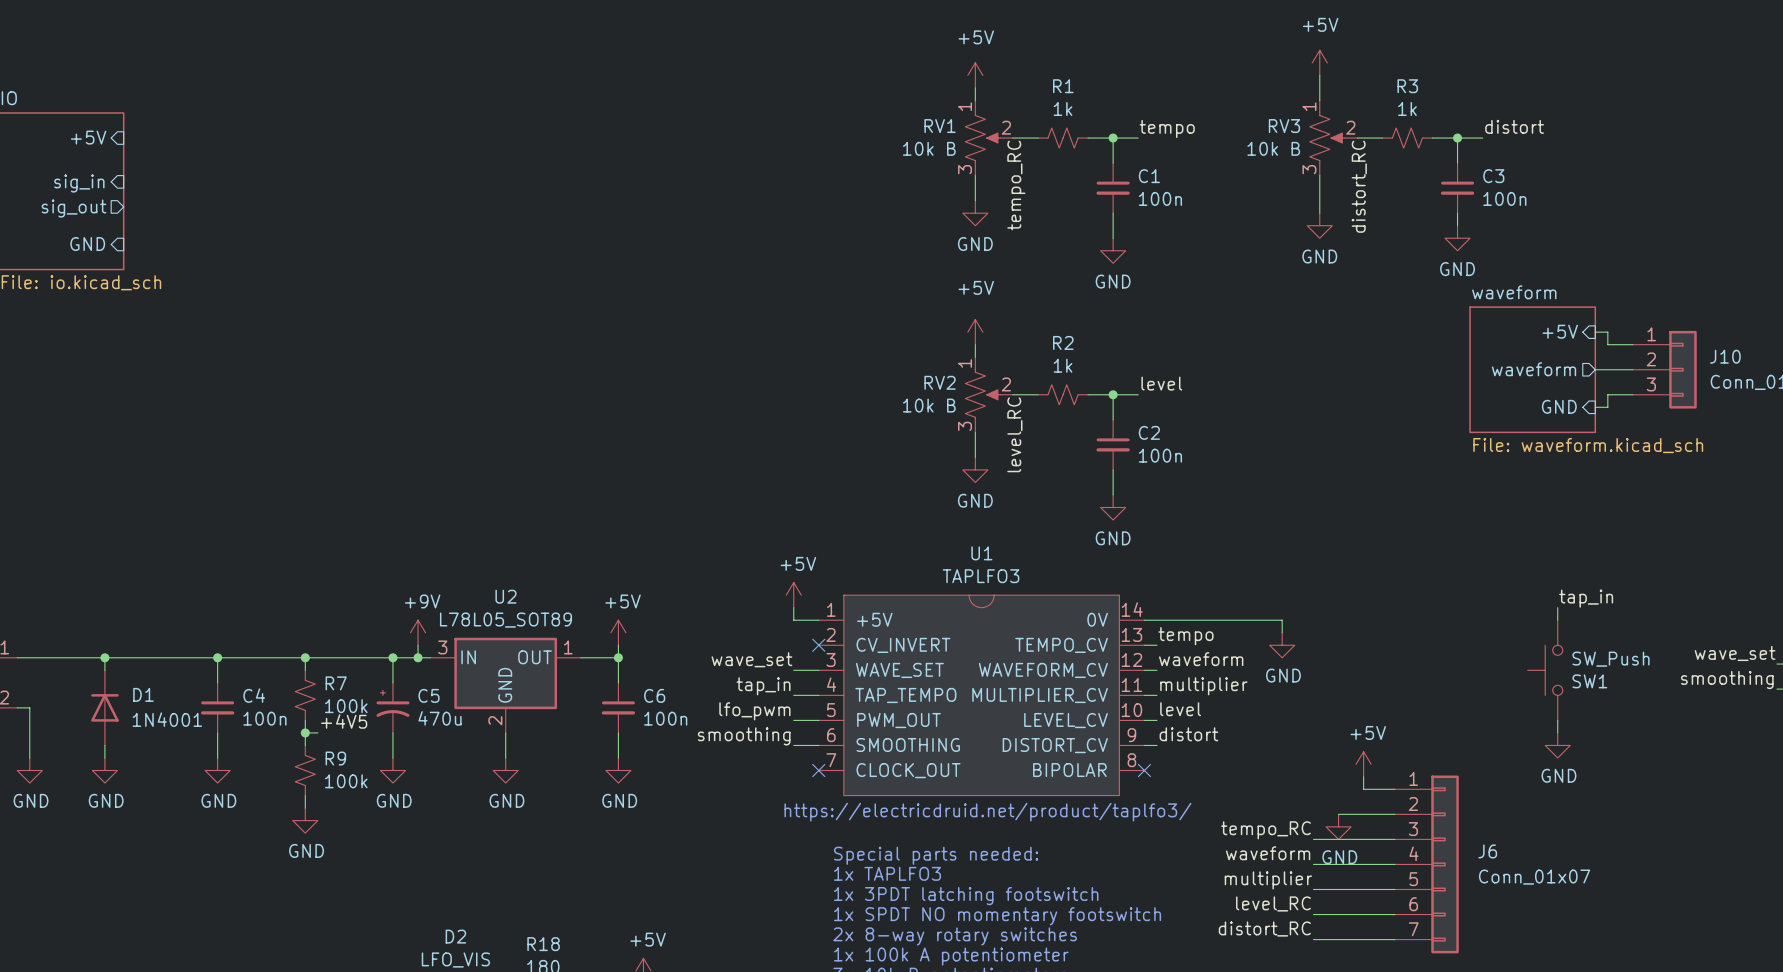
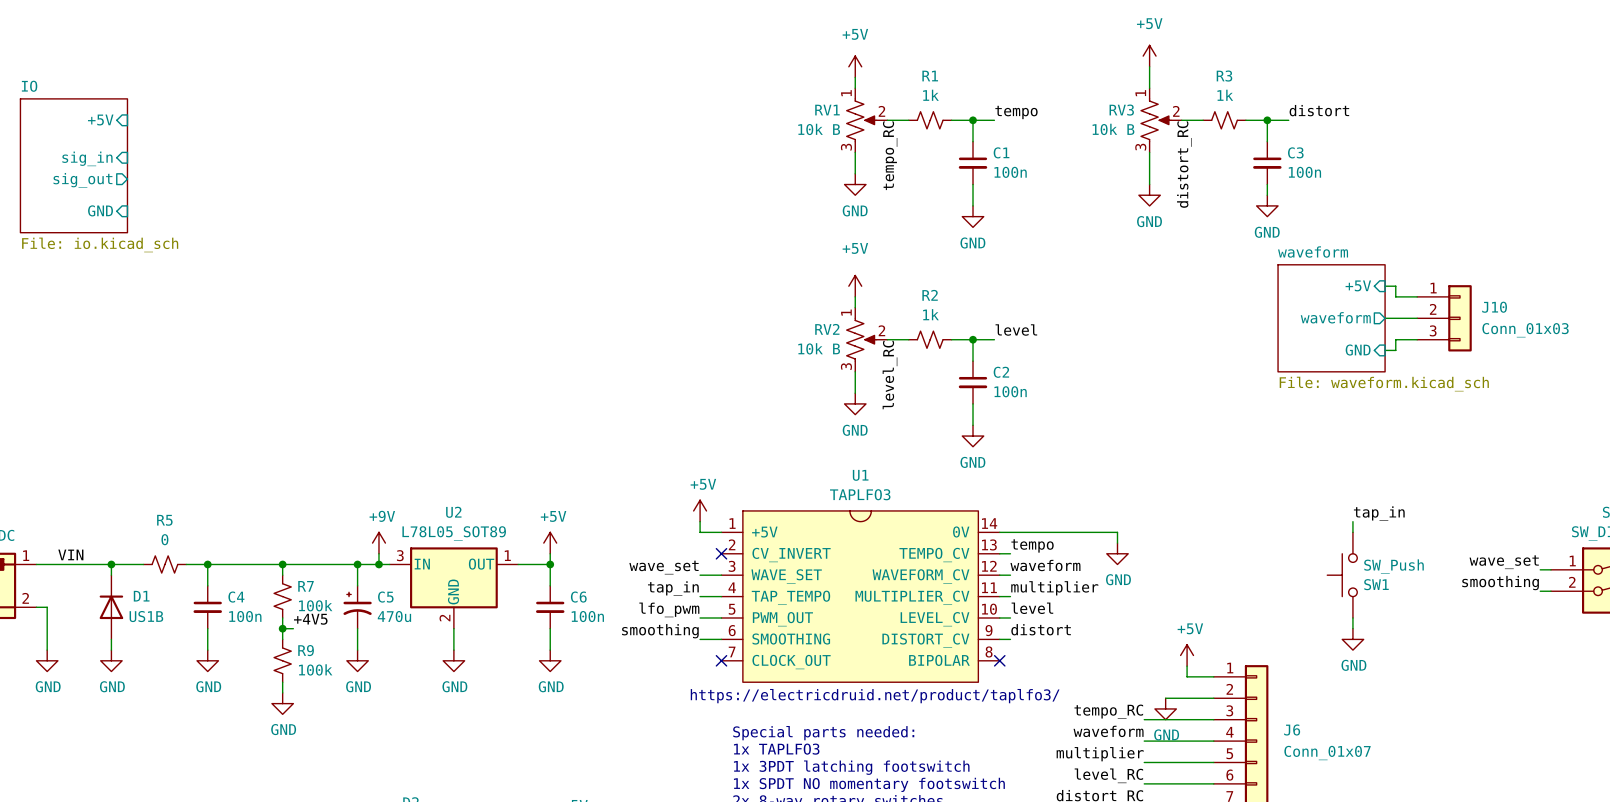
label: none -> VIN (70, 554)
R5: none -> 0 (164, 564)
D1 value: 1N4001 (167, 719) -> US1B (146, 616)

